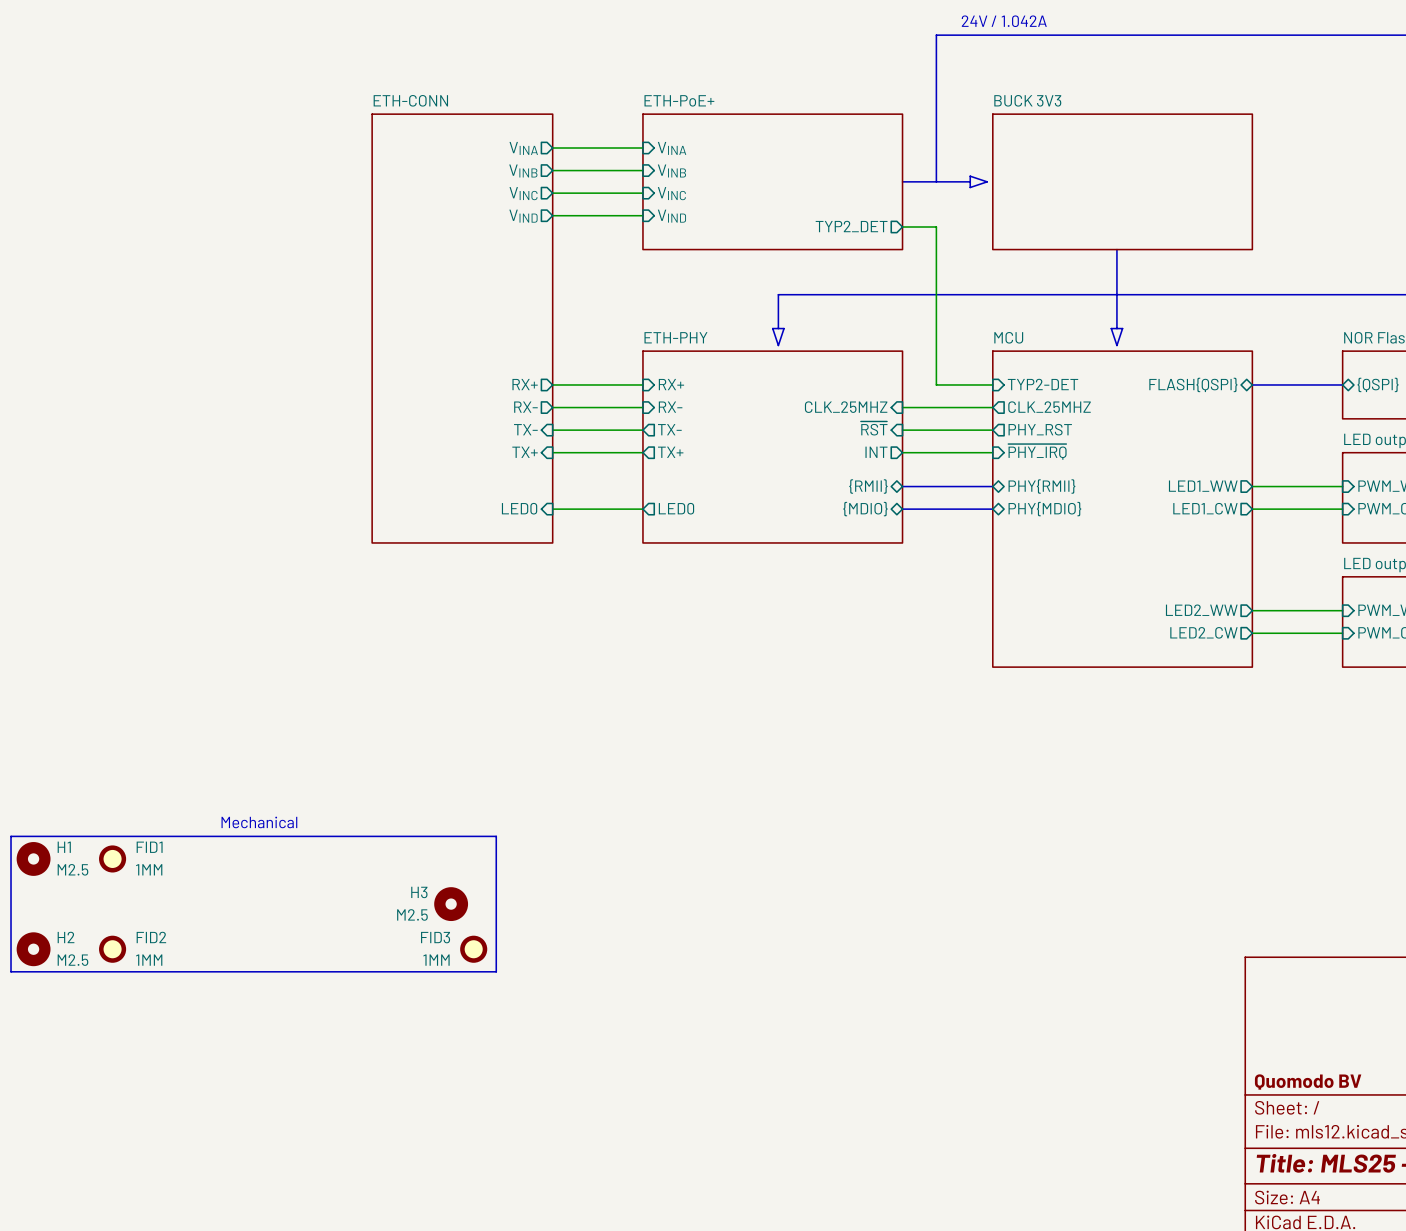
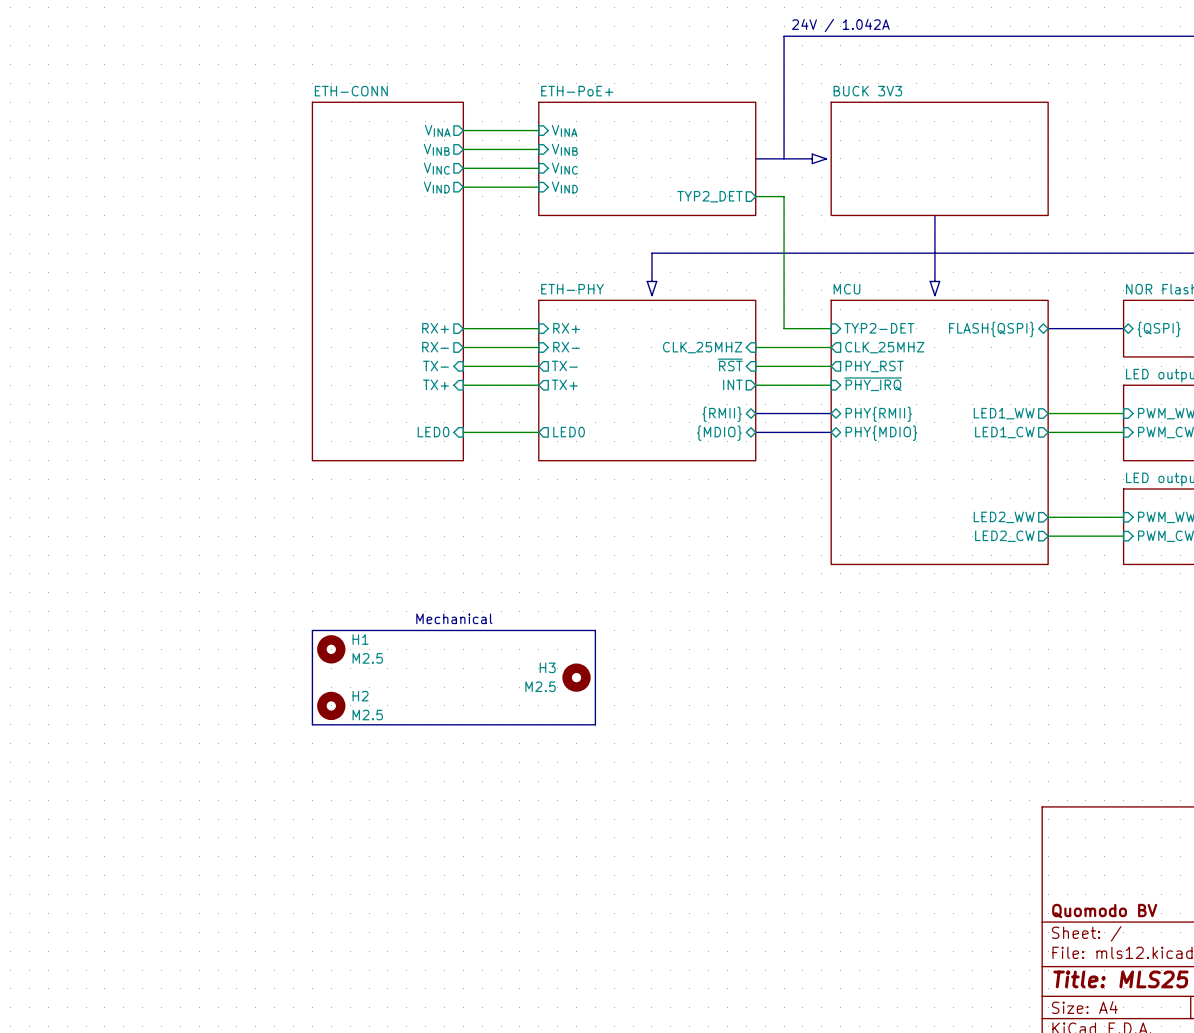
text: none -> Mechanical (454, 618)
line: none -> (312, 630) (595, 630) (595, 724) (312, 724) (312, 630)
text: Mechanical (259, 822) -> none
line: (11, 836) (496, 836) (496, 971) (11, 971) (11, 836) -> none
H1 position: (33, 858) -> (331, 649)
FID1: 1MM (112, 858) -> none
H3 position: (451, 904) -> (576, 677)
H2 position: (33, 949) -> (331, 705)
FID2: 1MM (112, 949) -> none
FID3: 1MM (473, 949) -> none

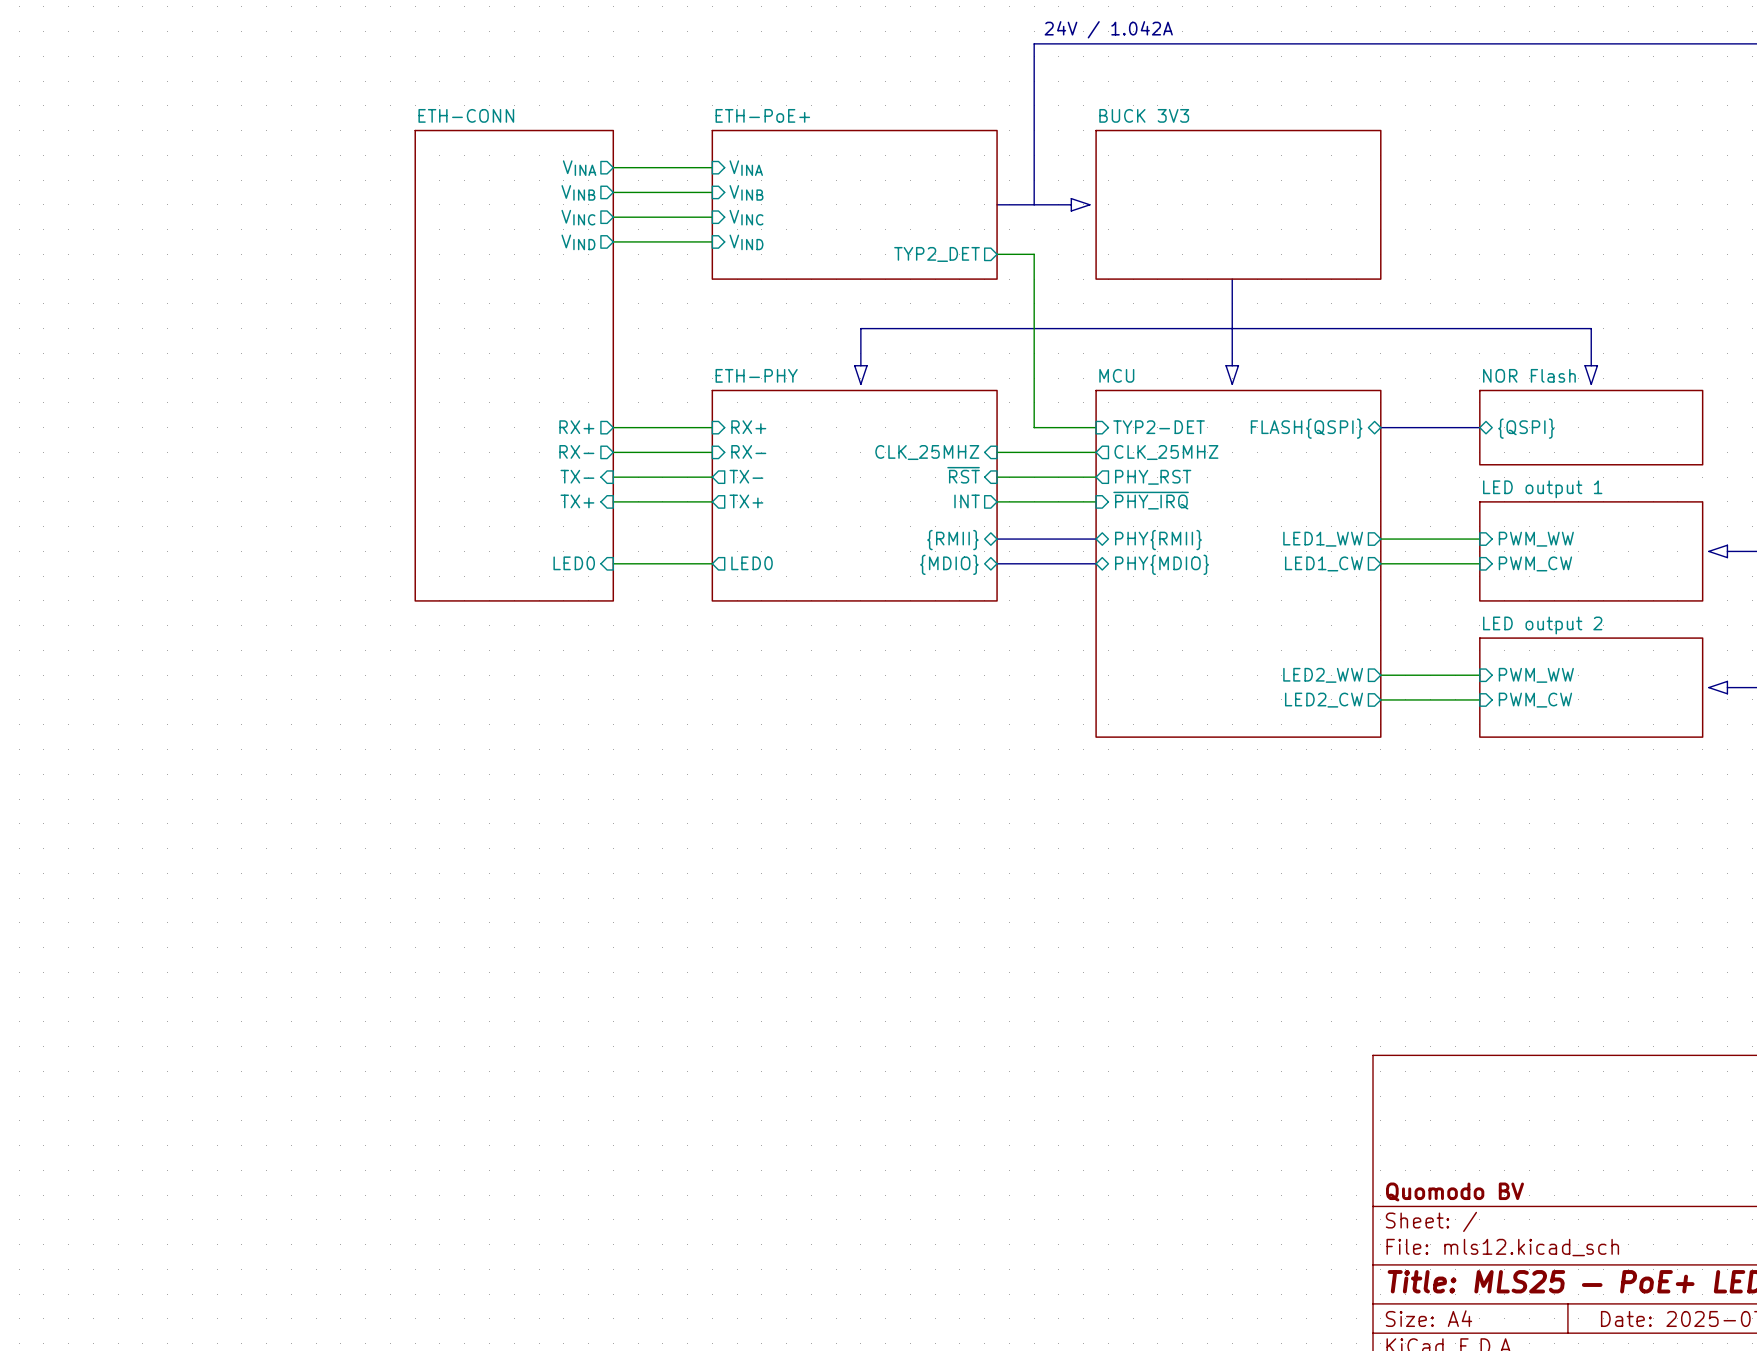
text: Mechanical (454, 618) -> none
line: (312, 630) (595, 630) (595, 724) (312, 724) (312, 630) -> none
H1: M2.5 (331, 649) -> none
H3: M2.5 (576, 677) -> none
H2: M2.5 (331, 705) -> none

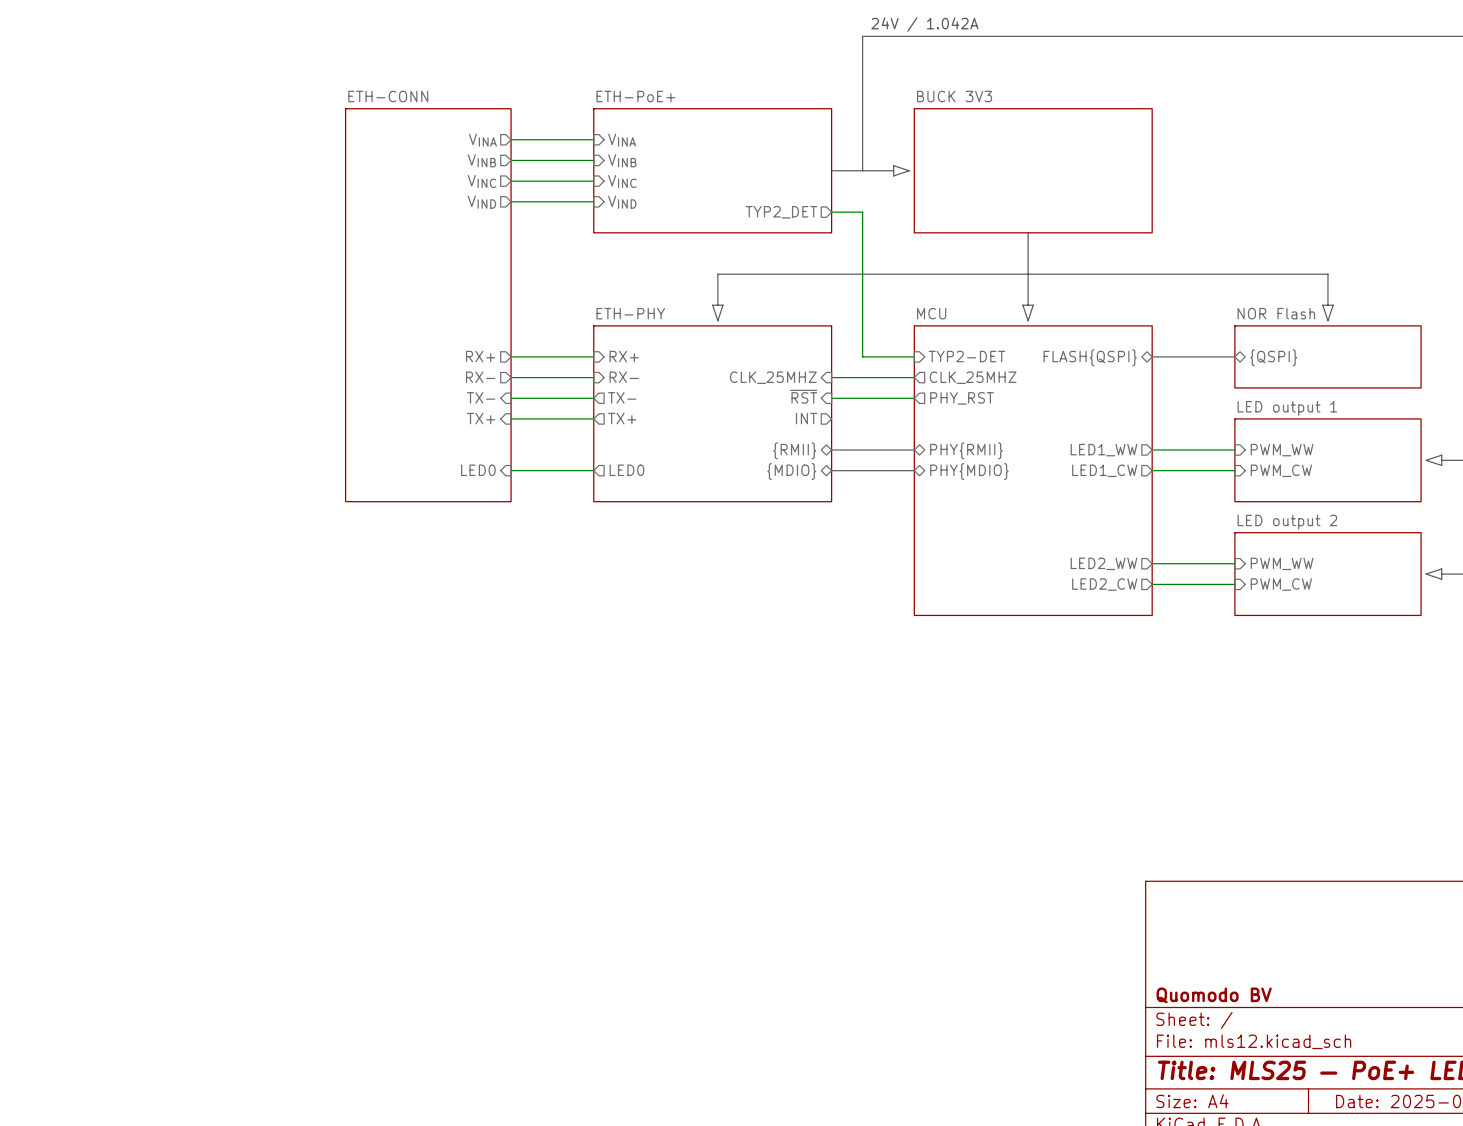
sheet pin: ~{PHY_IRQ} (1151, 500) -> none
wire: (997, 501) (1096, 501) -> none

